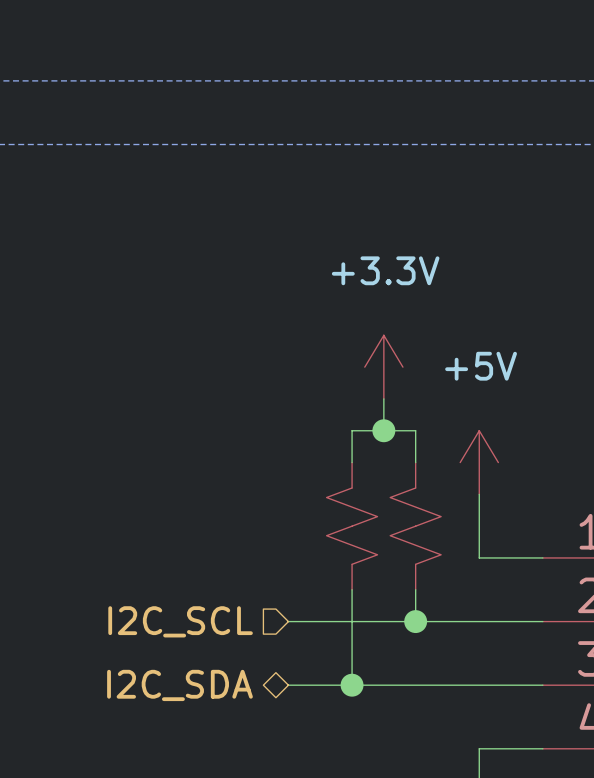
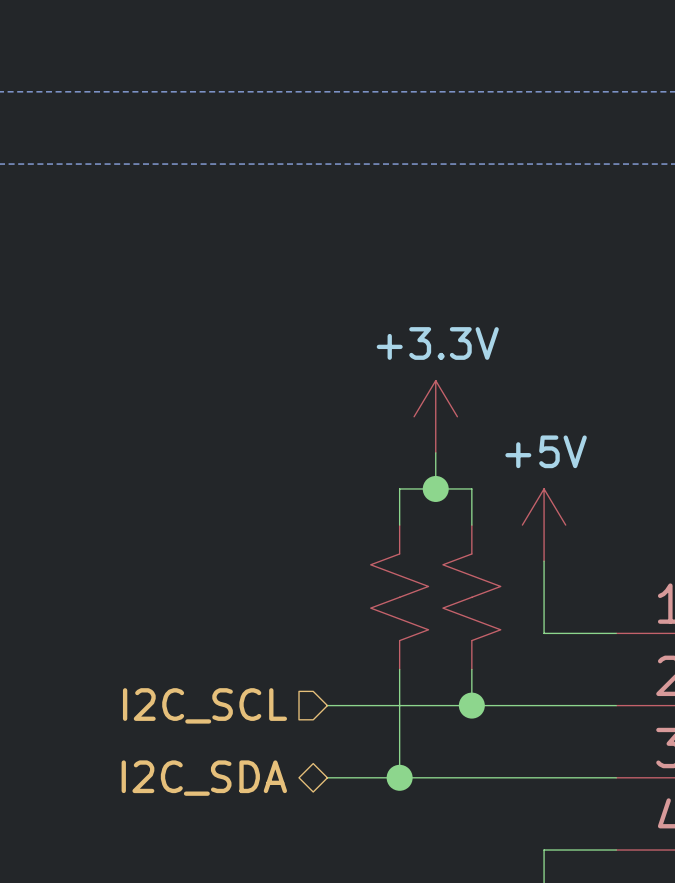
power symbol text position: +3.3V (385, 270) -> +3.3V (437, 343)
power symbol text position: +5V (481, 366) -> +5V (546, 451)

